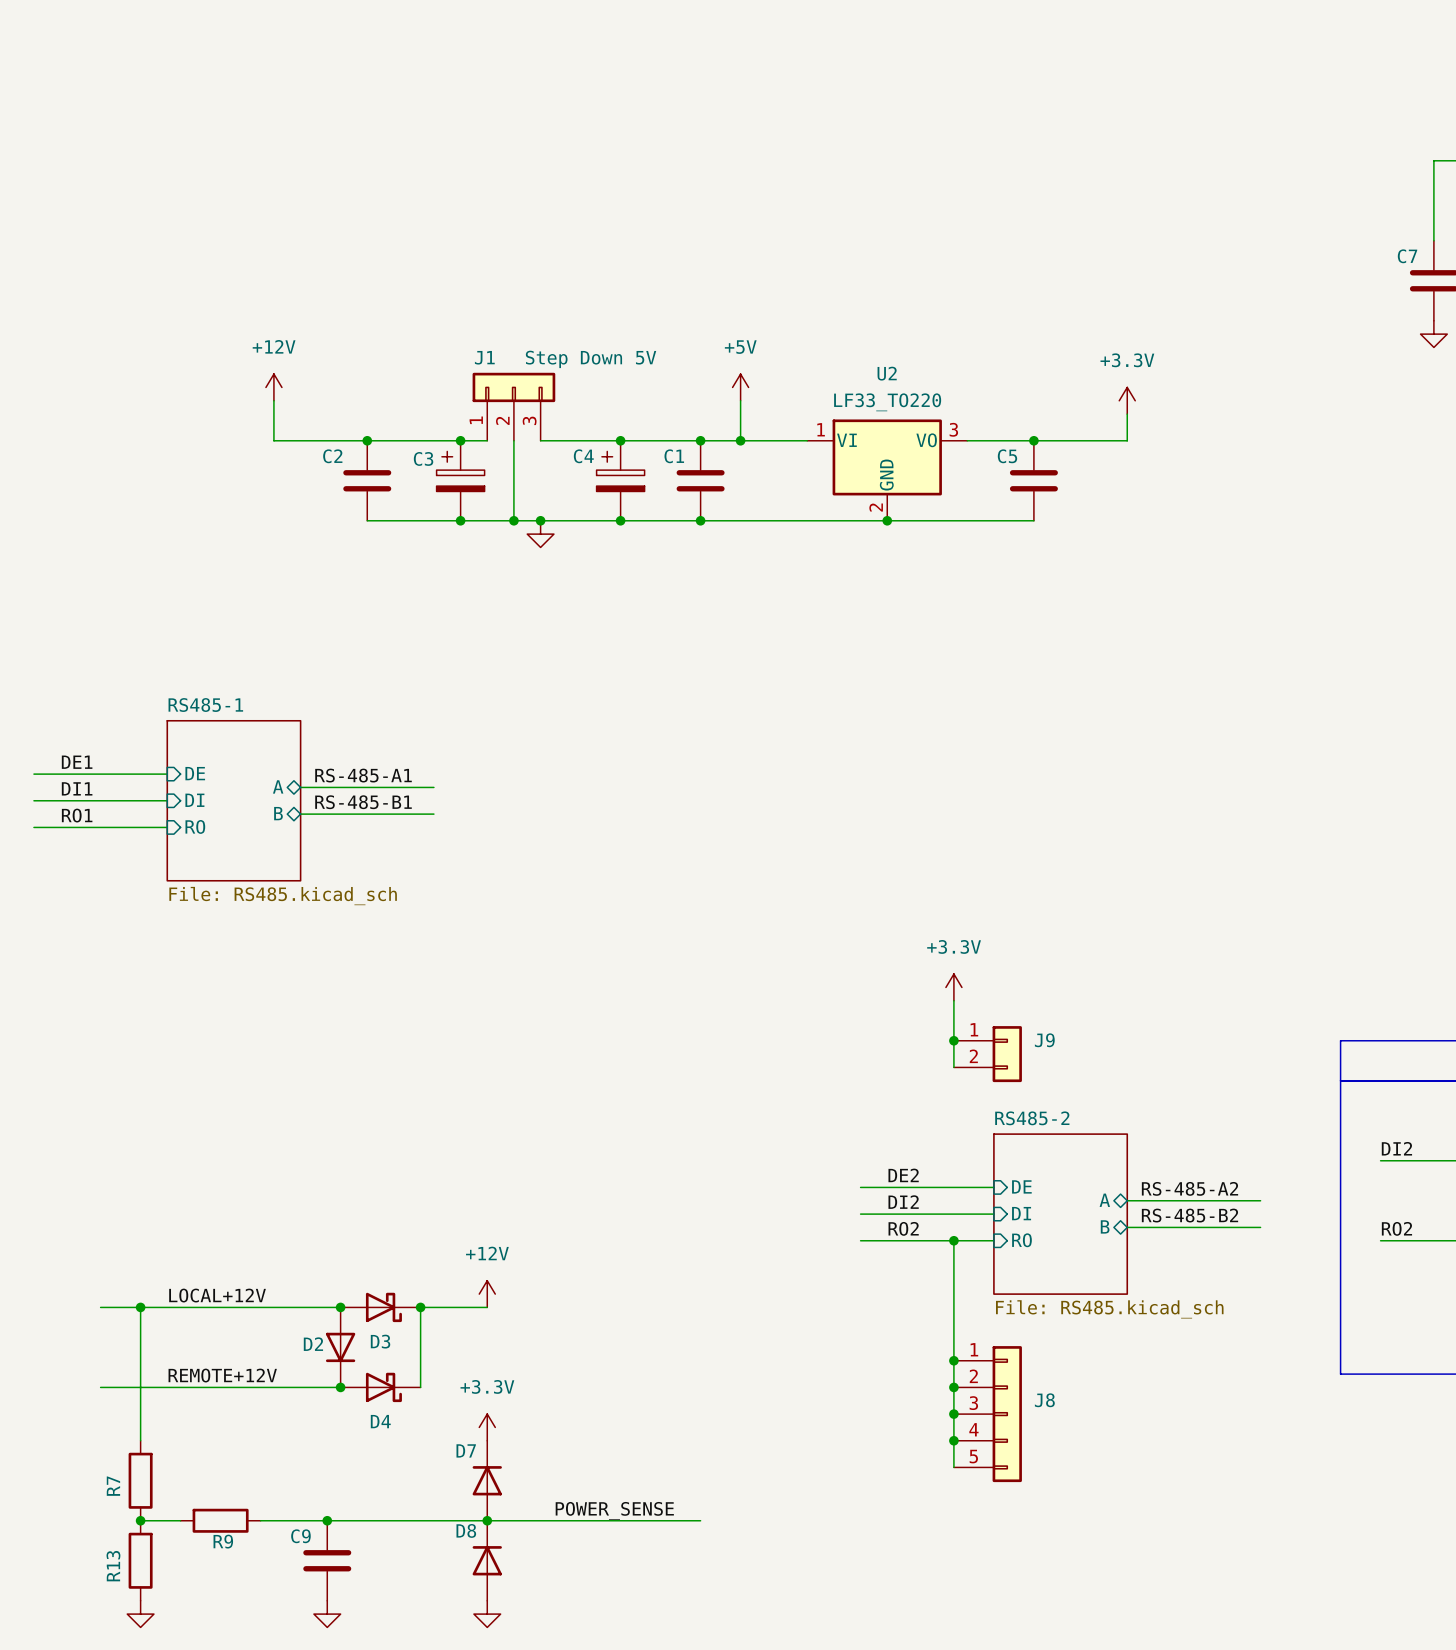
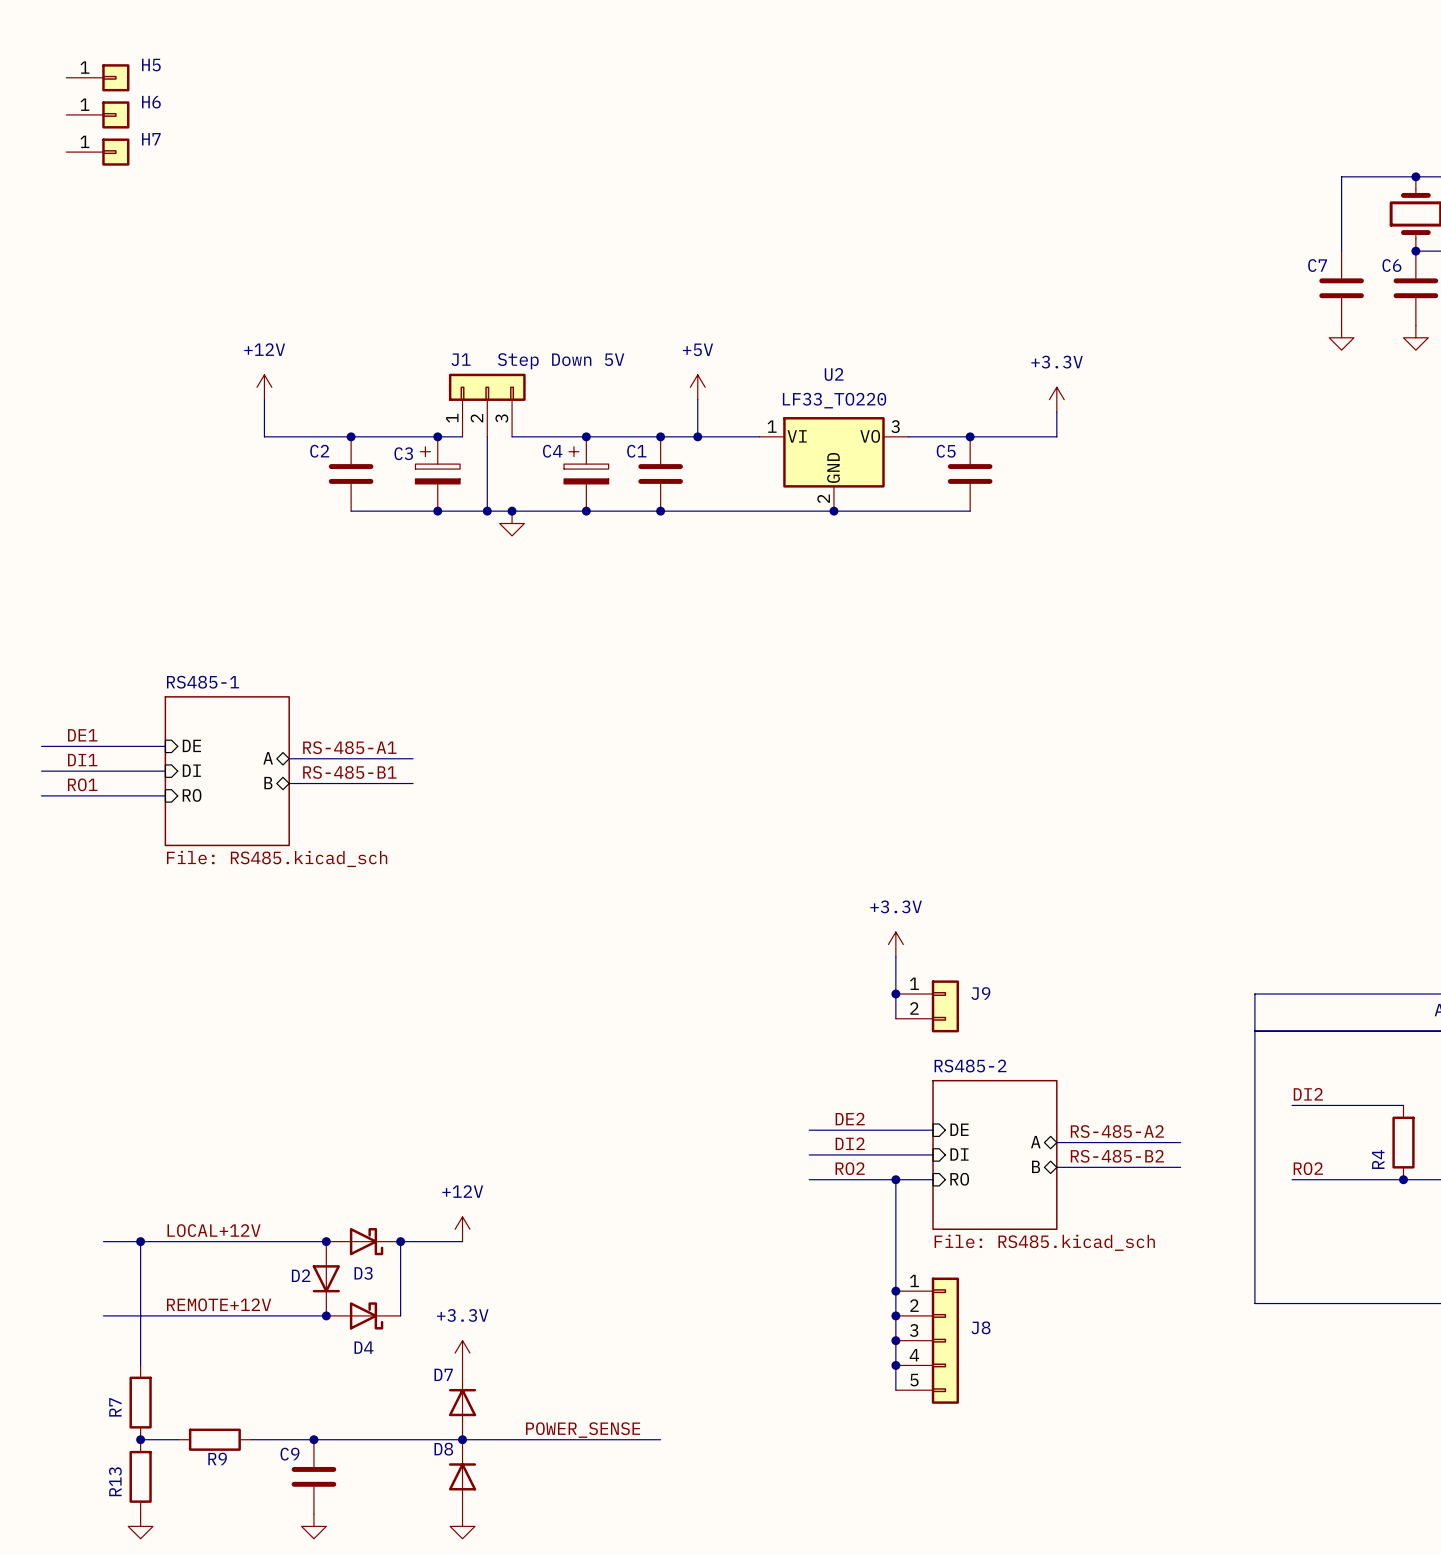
H5: none -> (97, 77)
H6: none -> (97, 114)
H7: none -> (97, 152)

